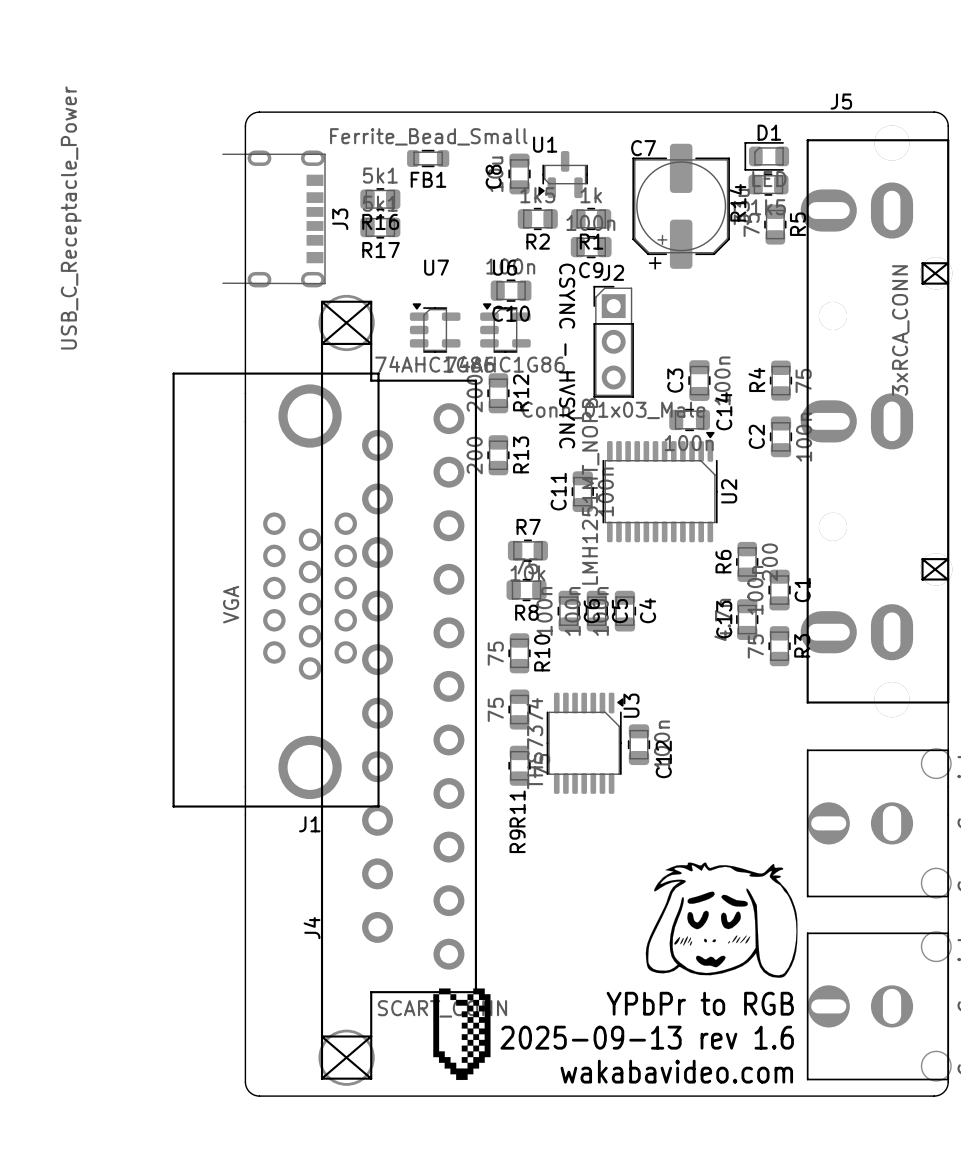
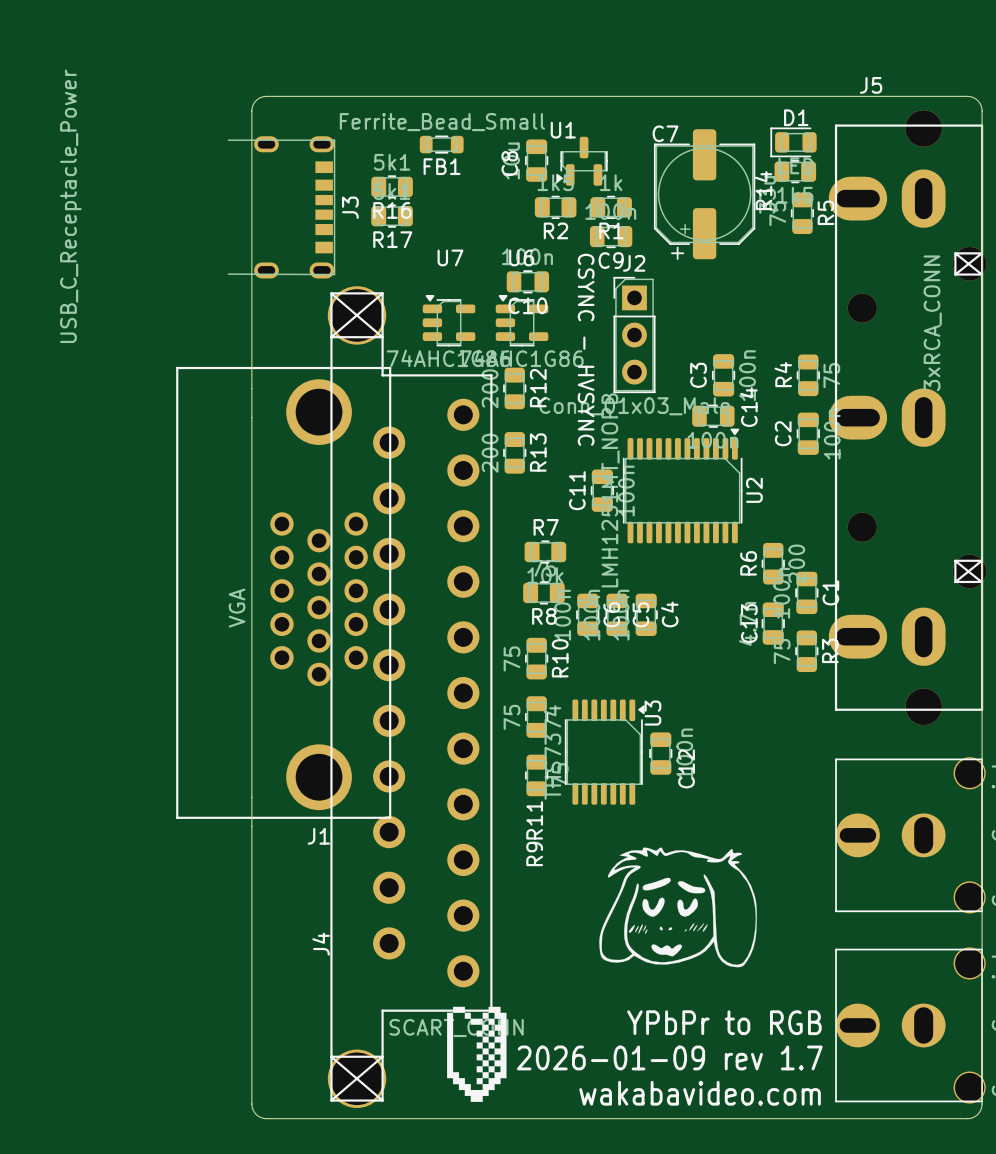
drawing position: (721, 920) -> (678, 907)
text: 2025-09-13 rev 1.6 (647, 1037) -> 2026-01-09 rev 1.7 (669, 1057)

